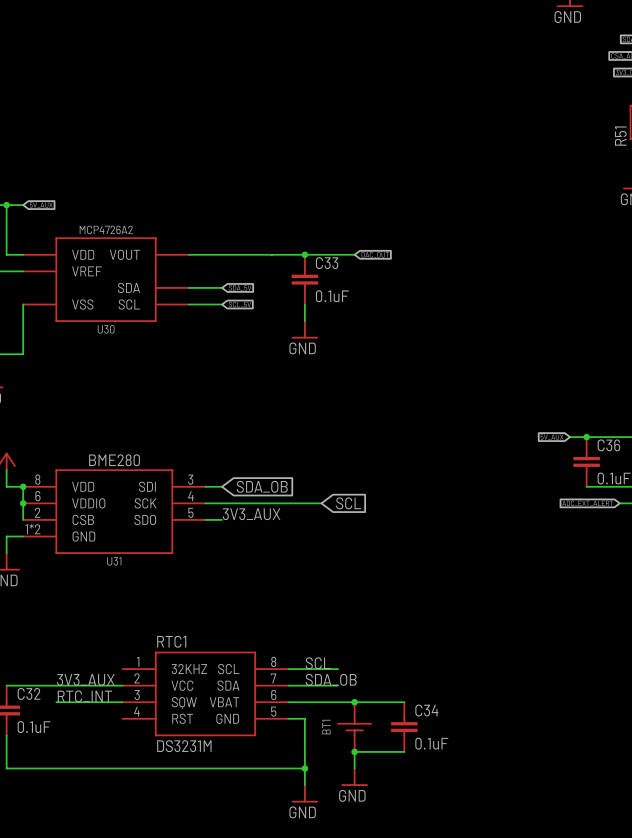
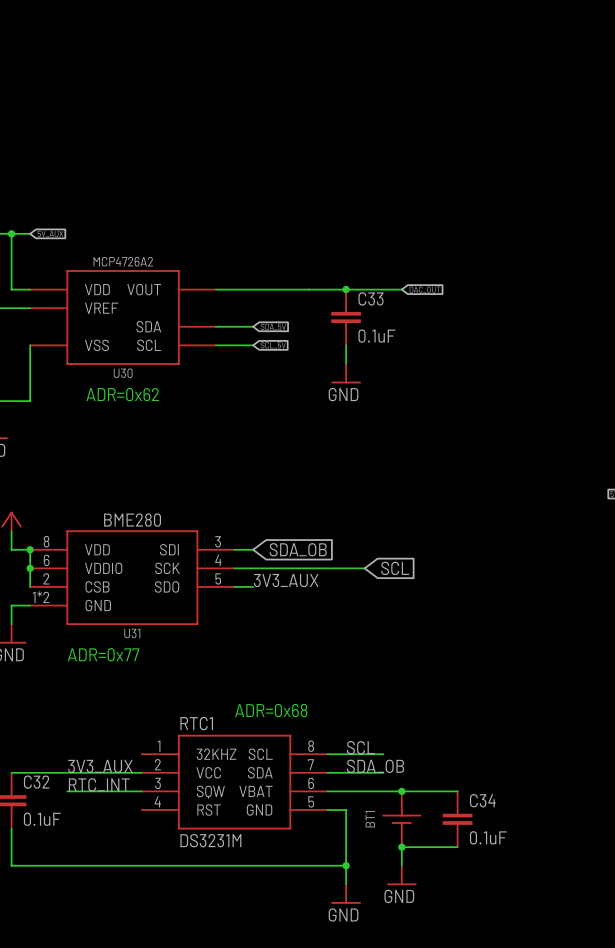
text: none -> ADR=0x62 (122, 394)
text: none -> ADR=0x77 (103, 654)
text: none -> ADR=0x68 (271, 710)

